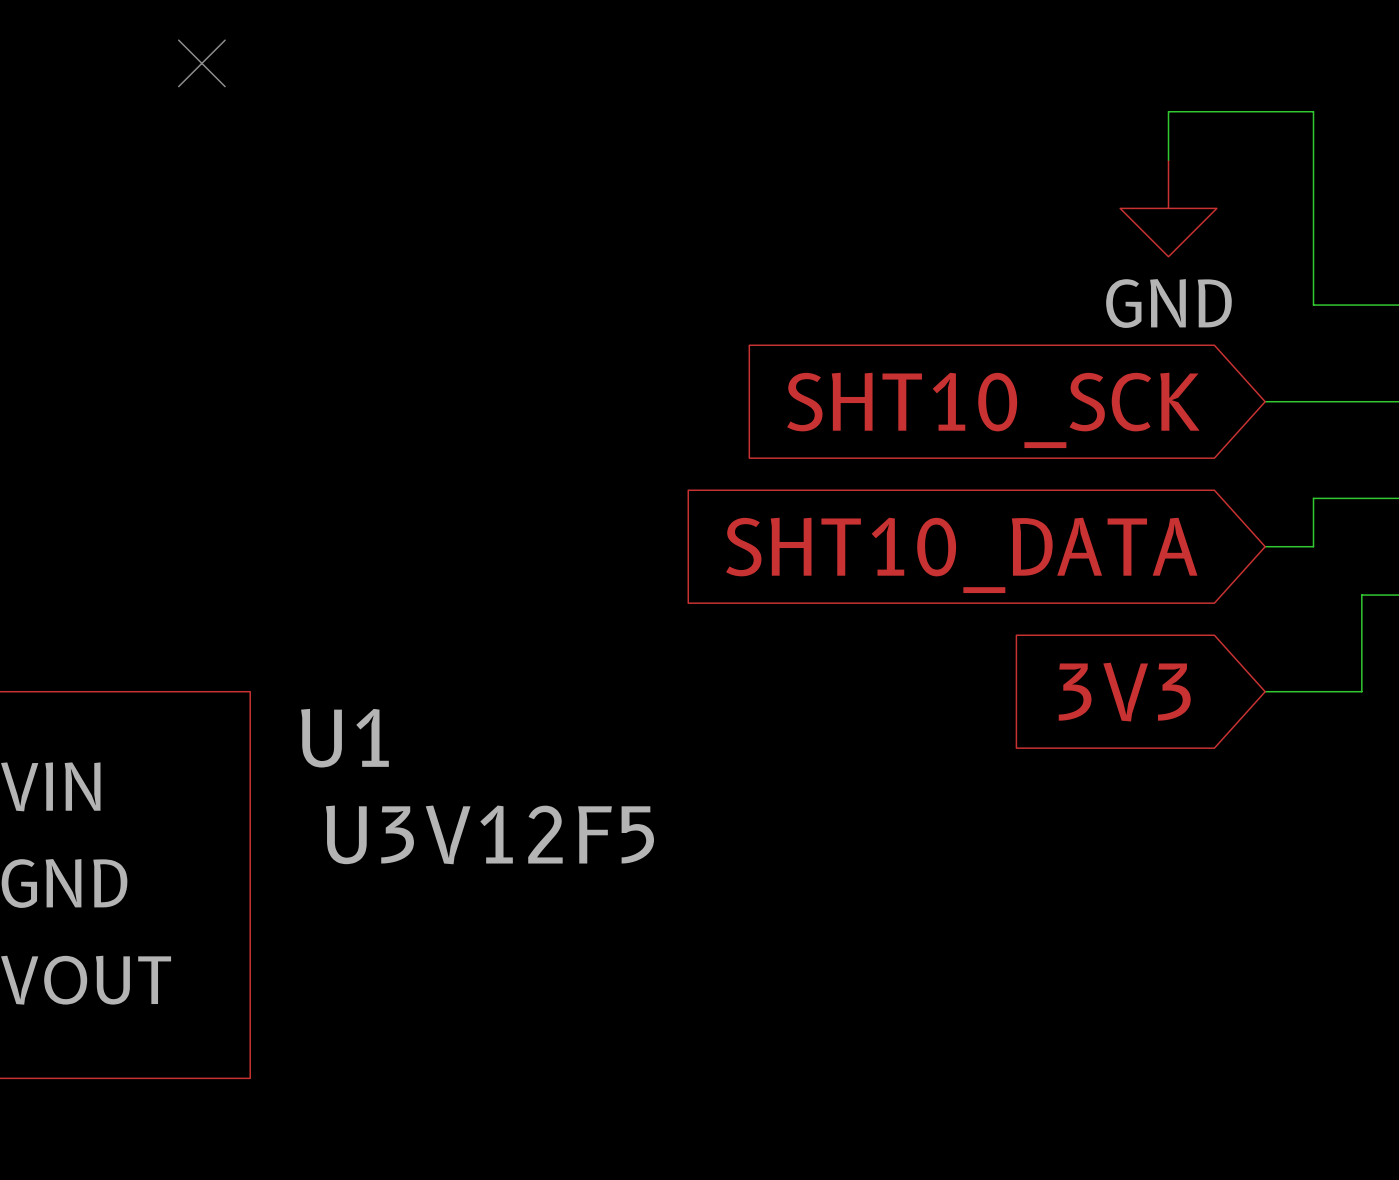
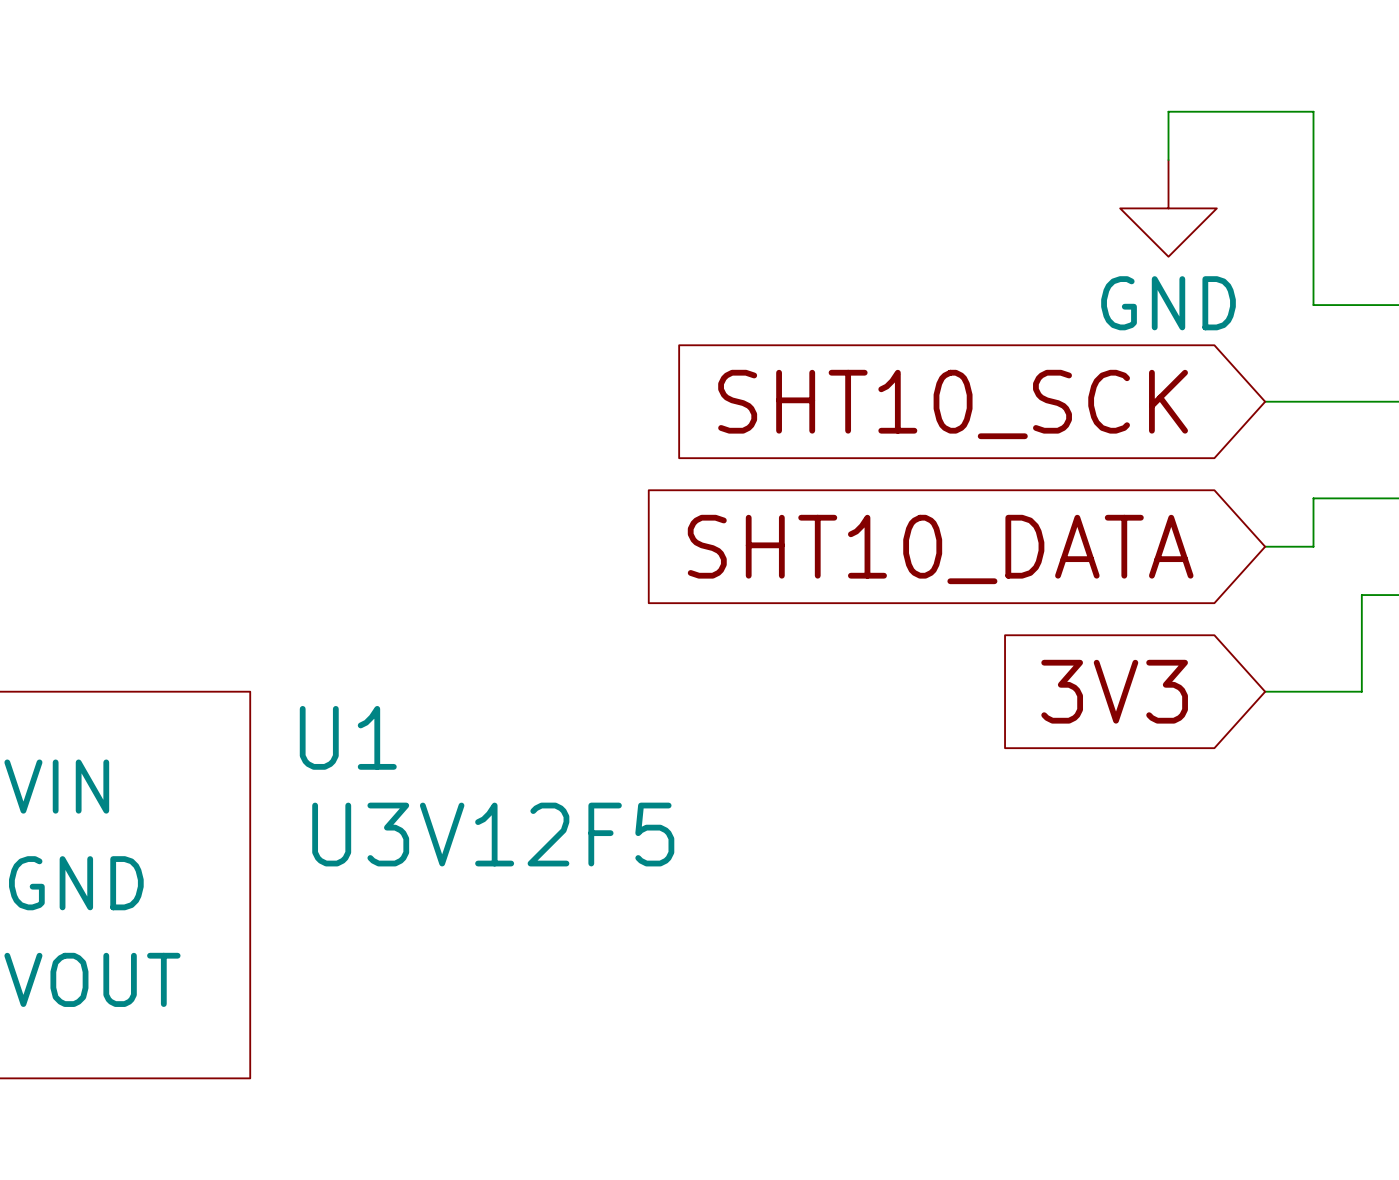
no-connect mark: (201, 63) -> none

